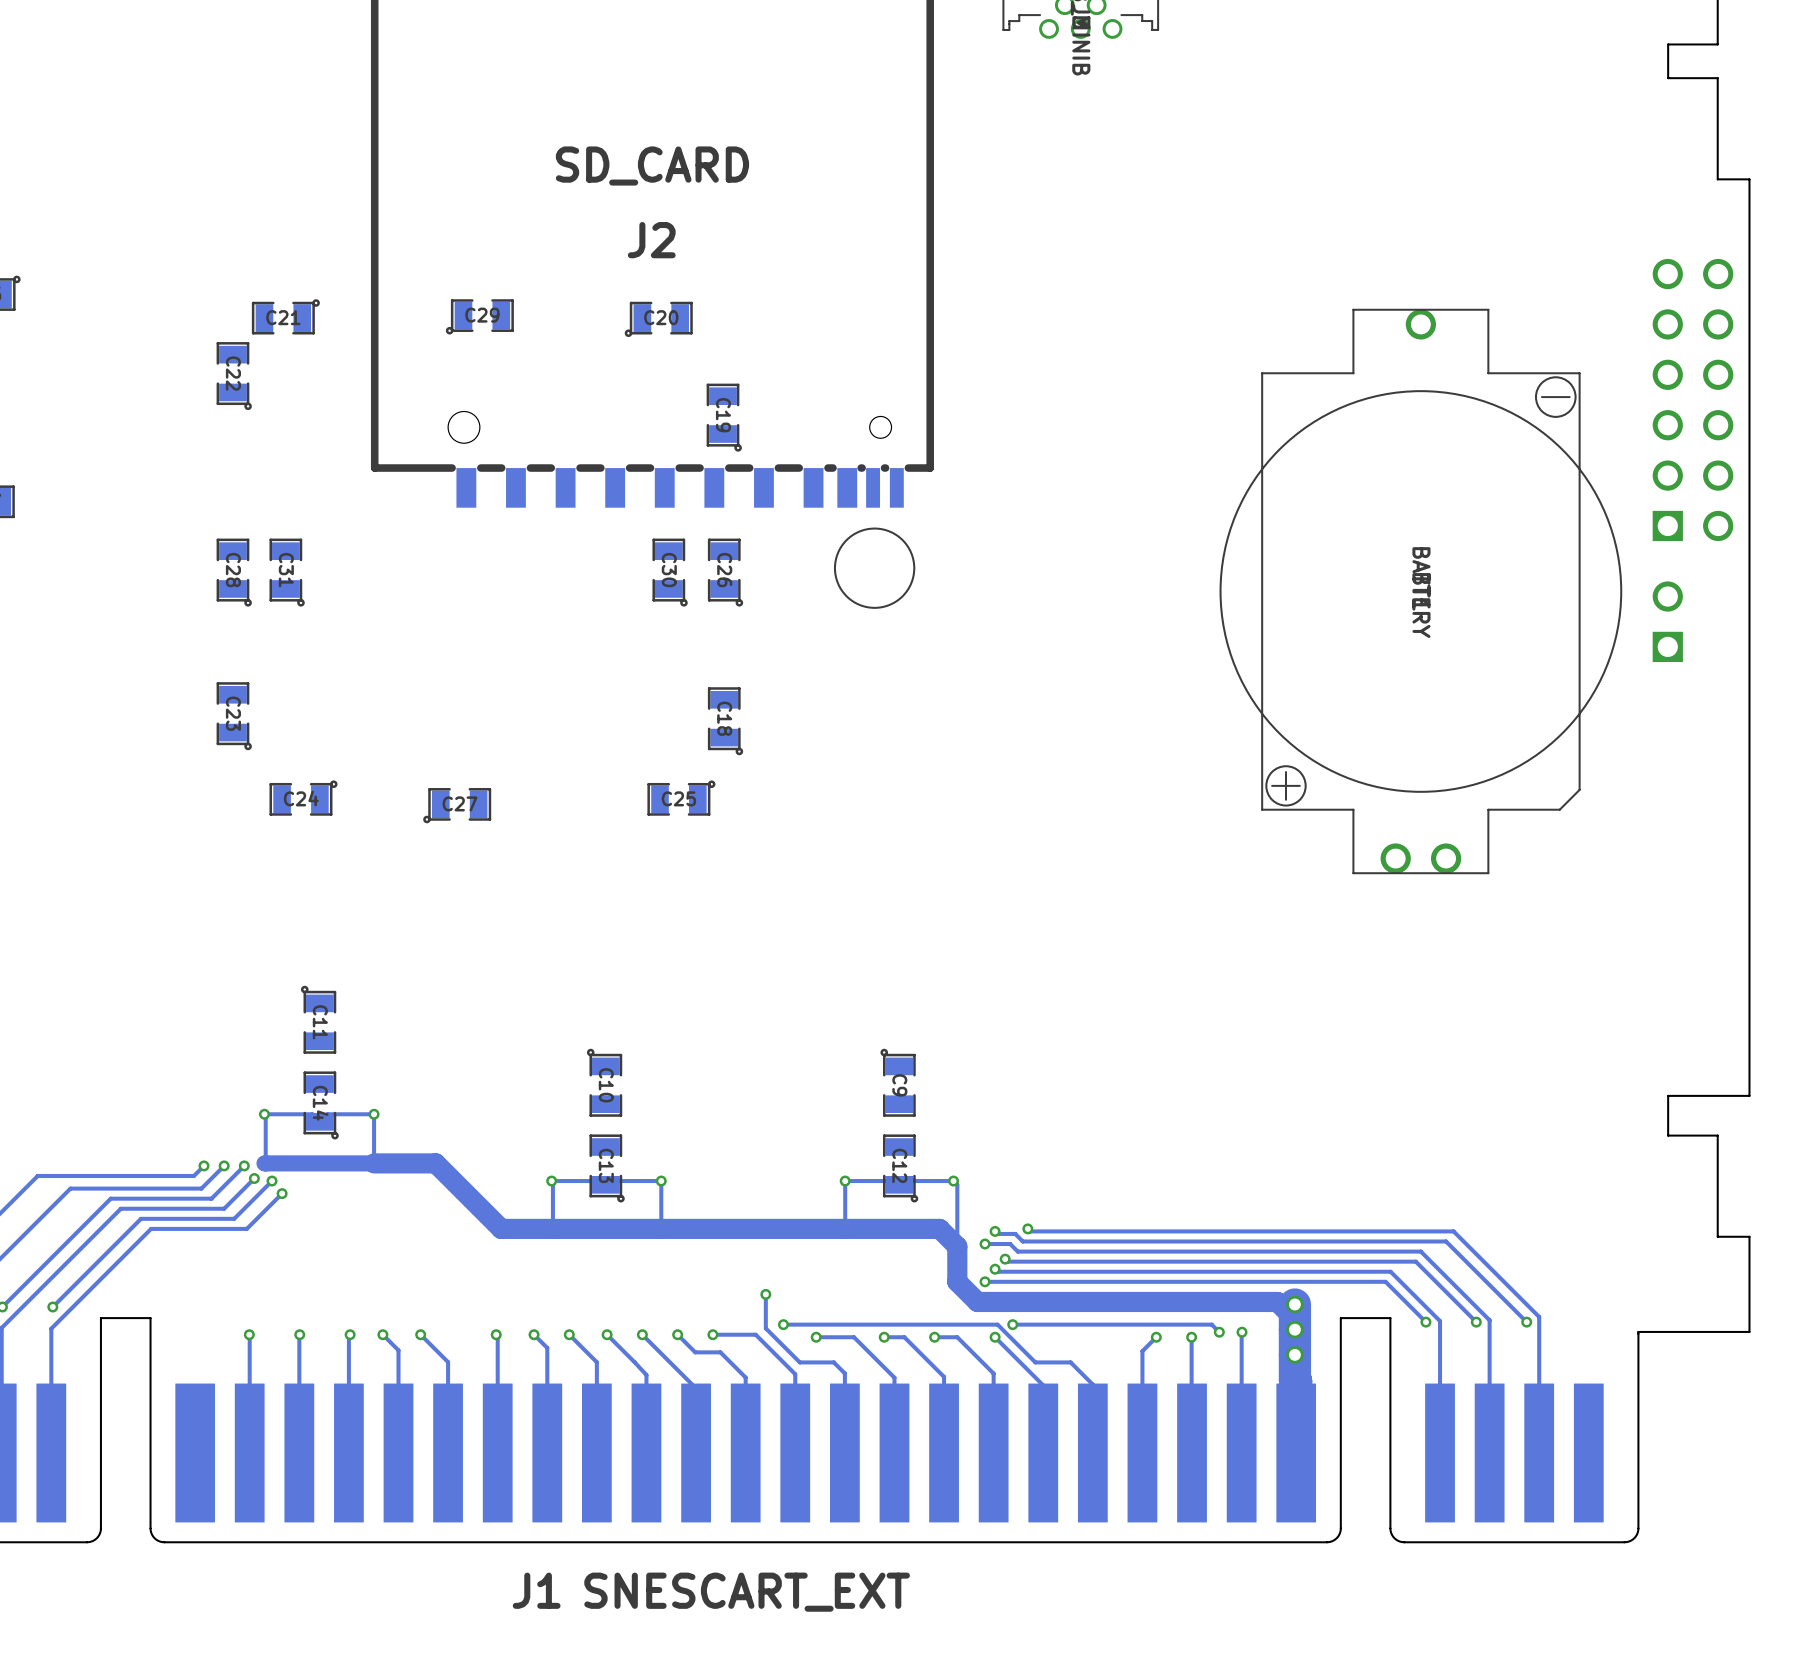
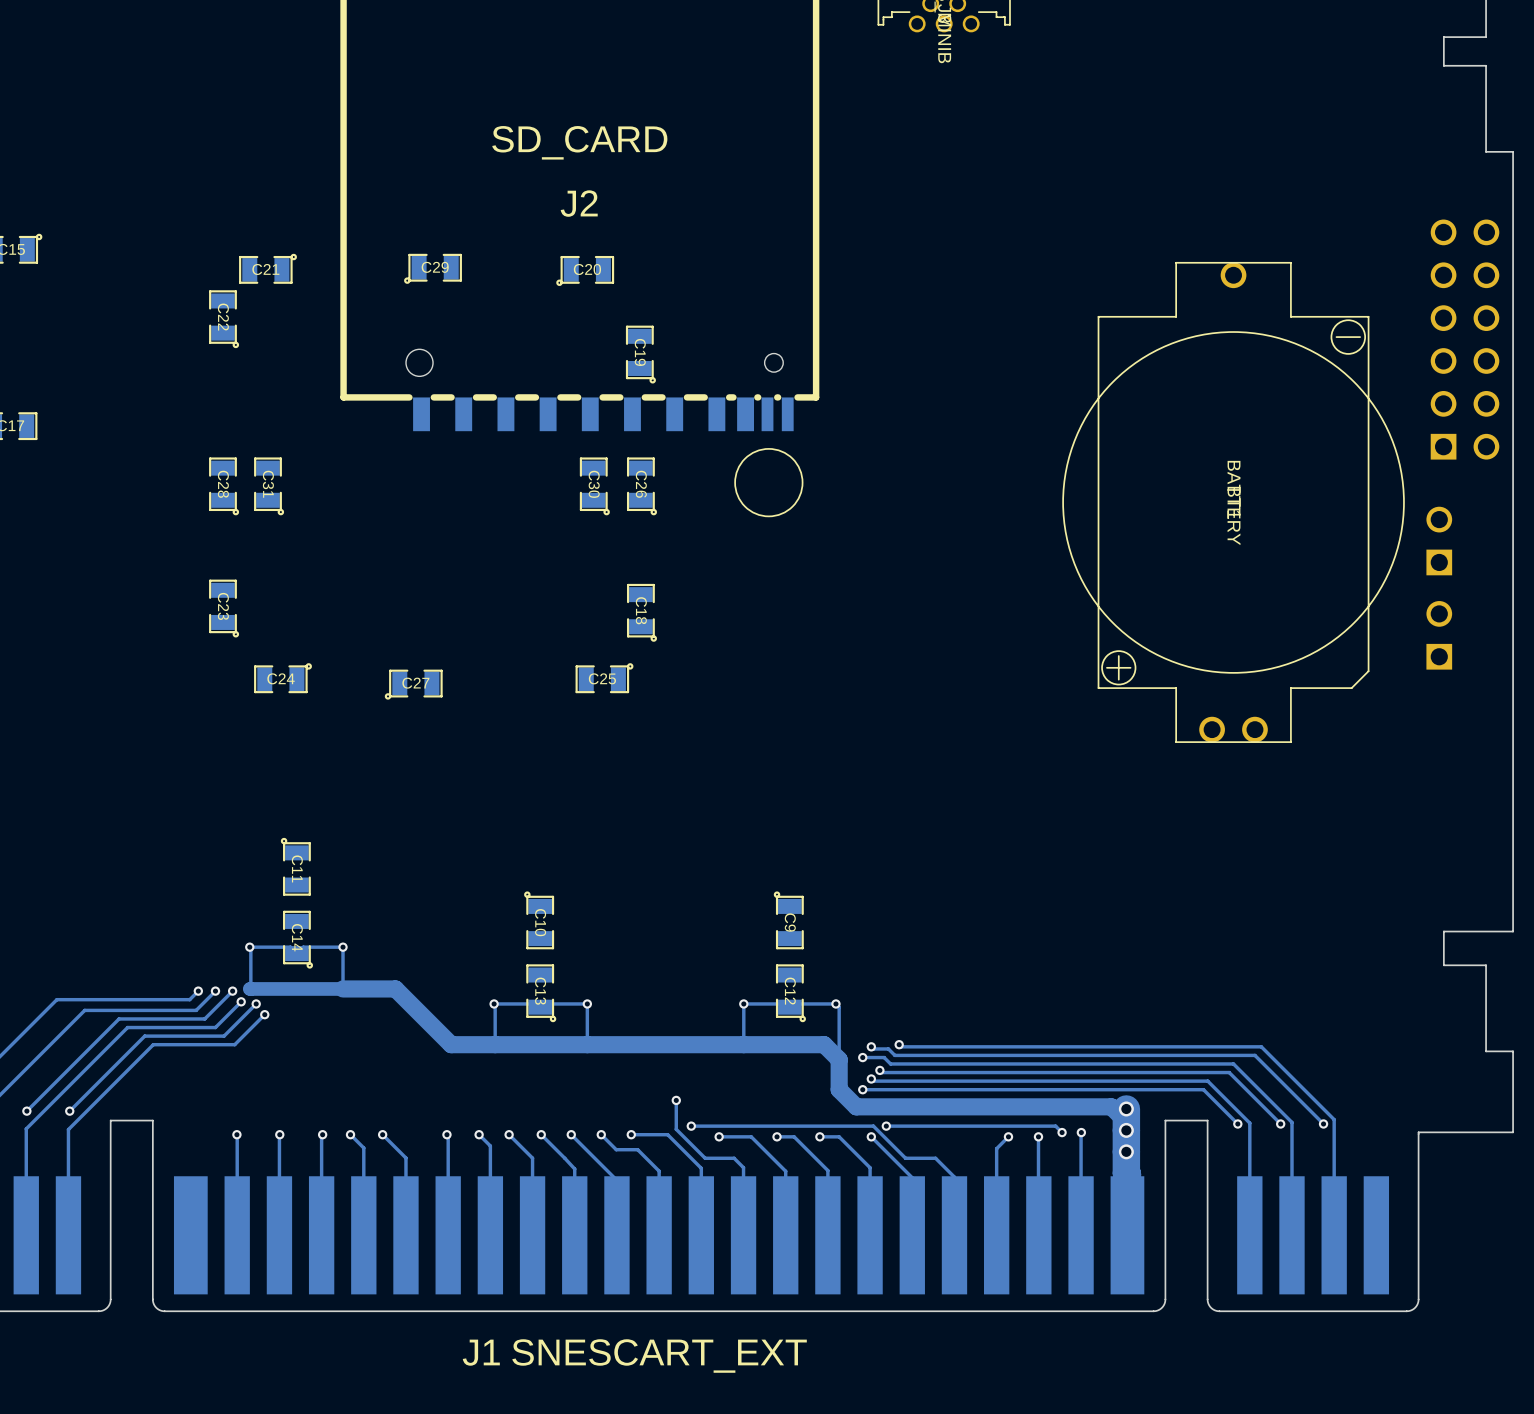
part position: (1667, 621) -> (1439, 541)
part: none -> (1439, 635)

